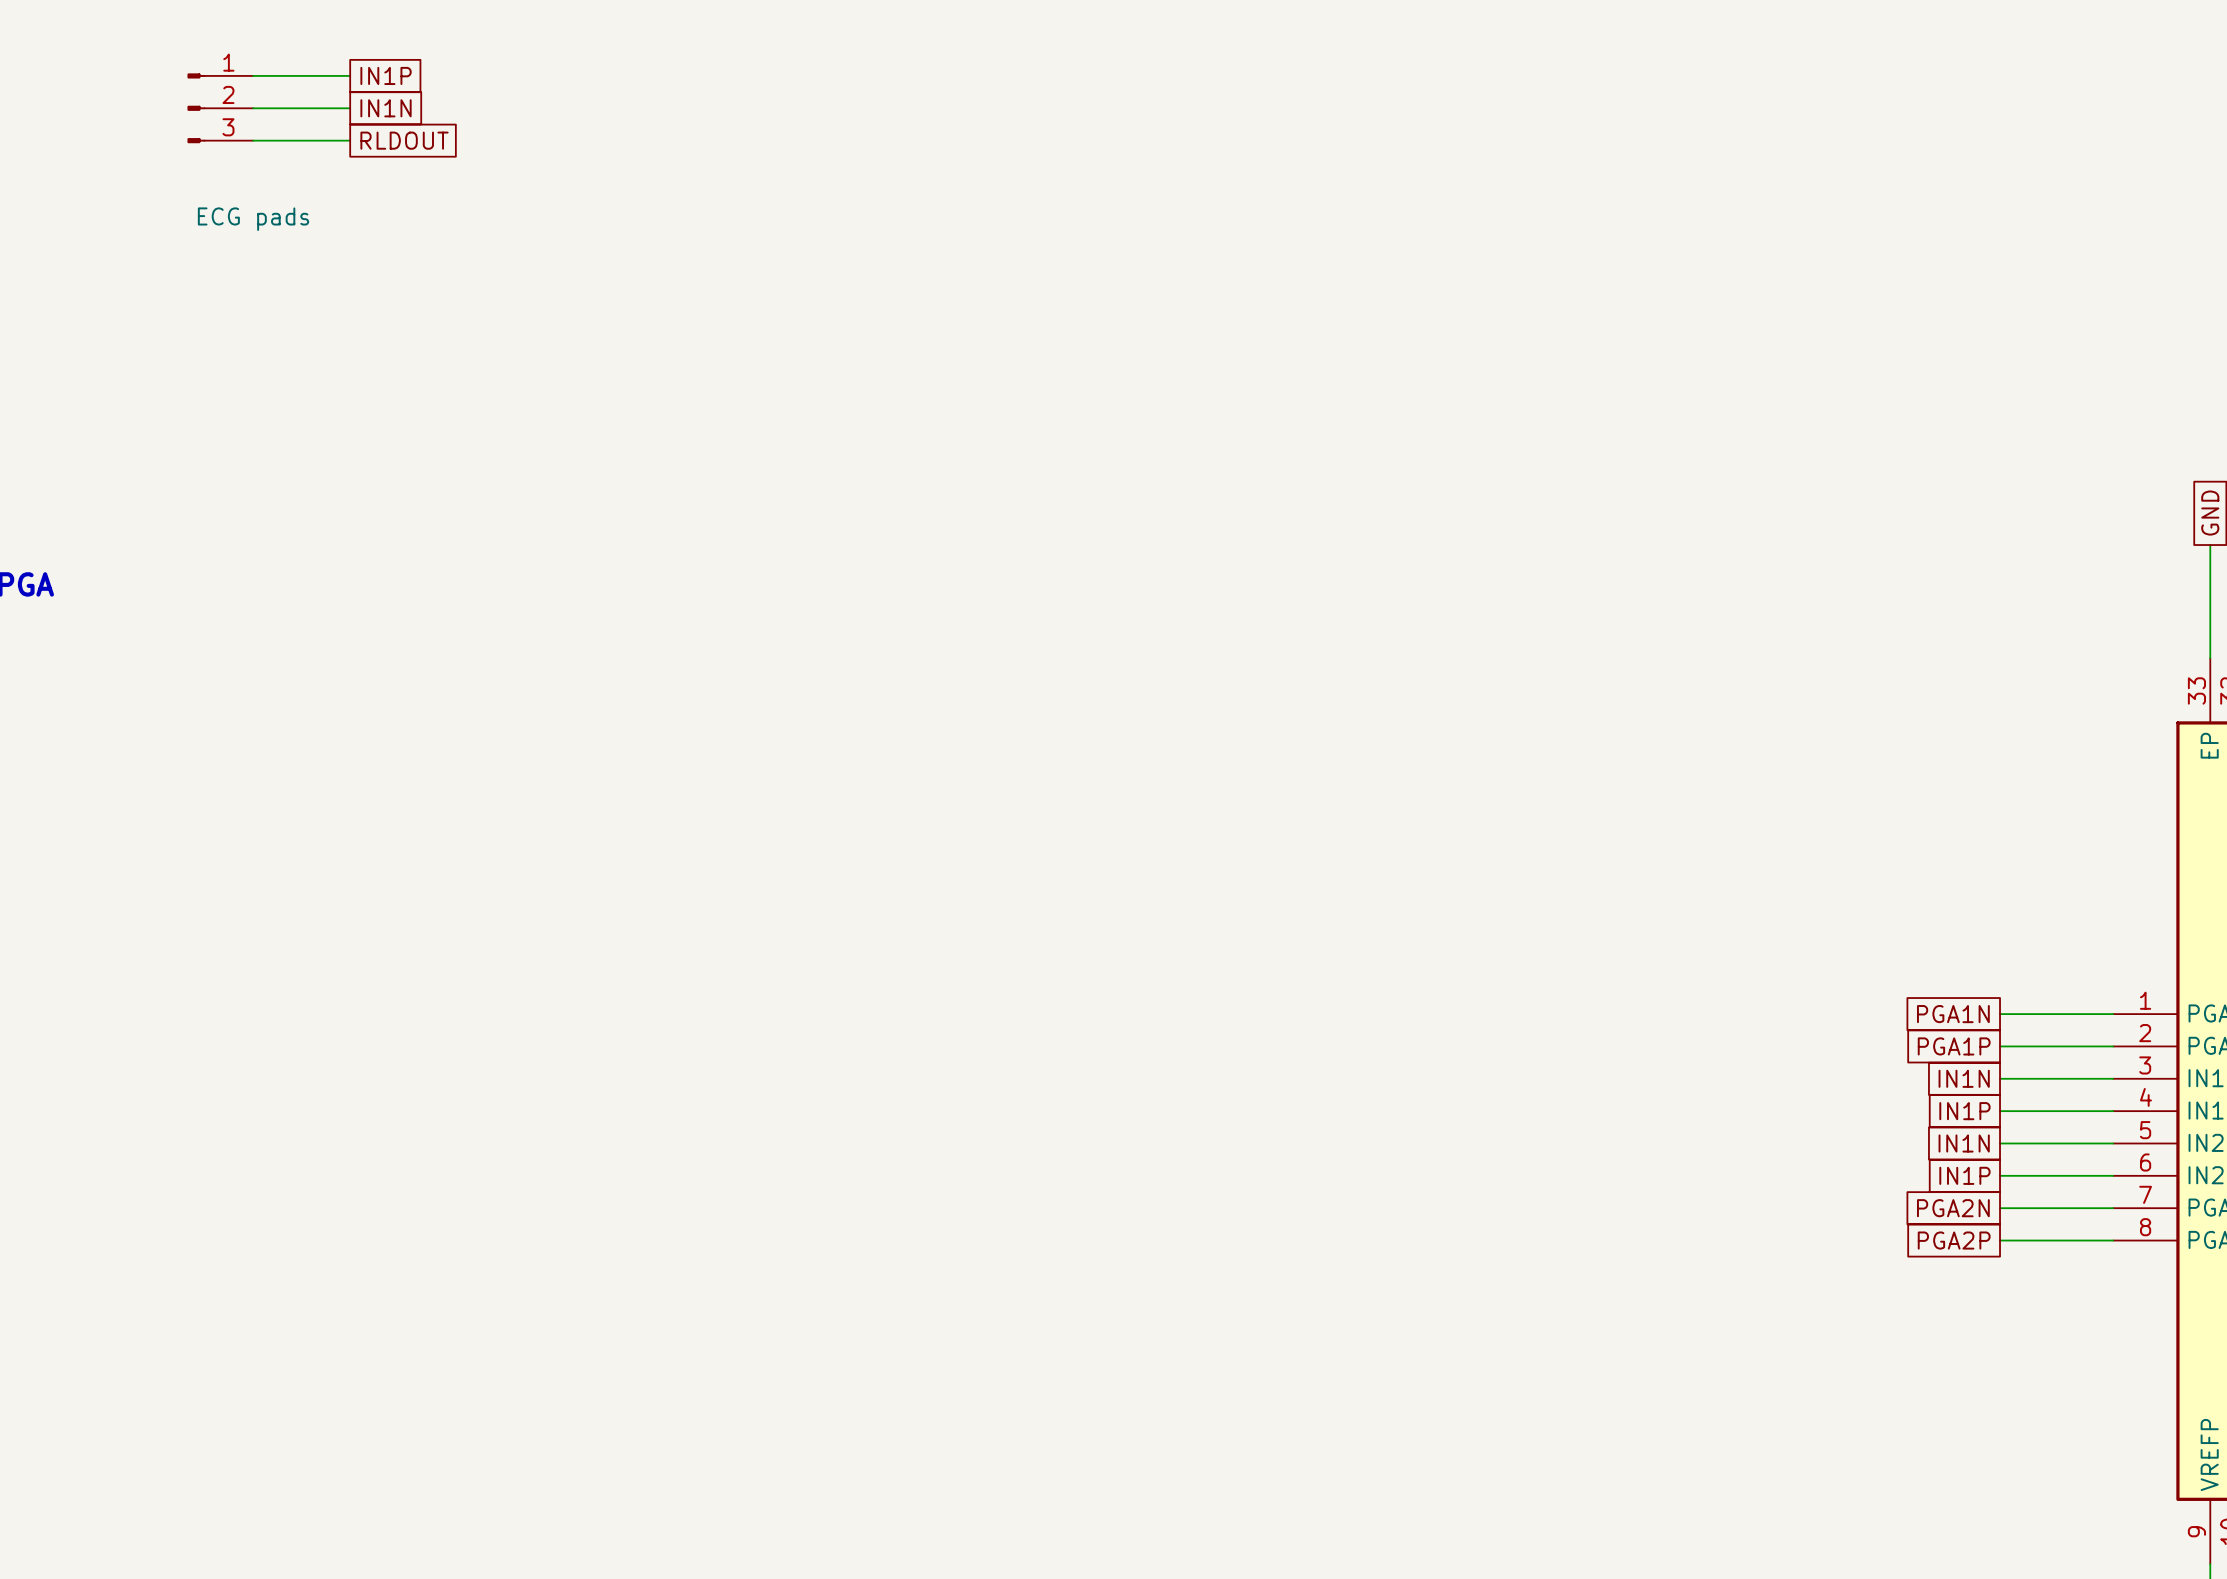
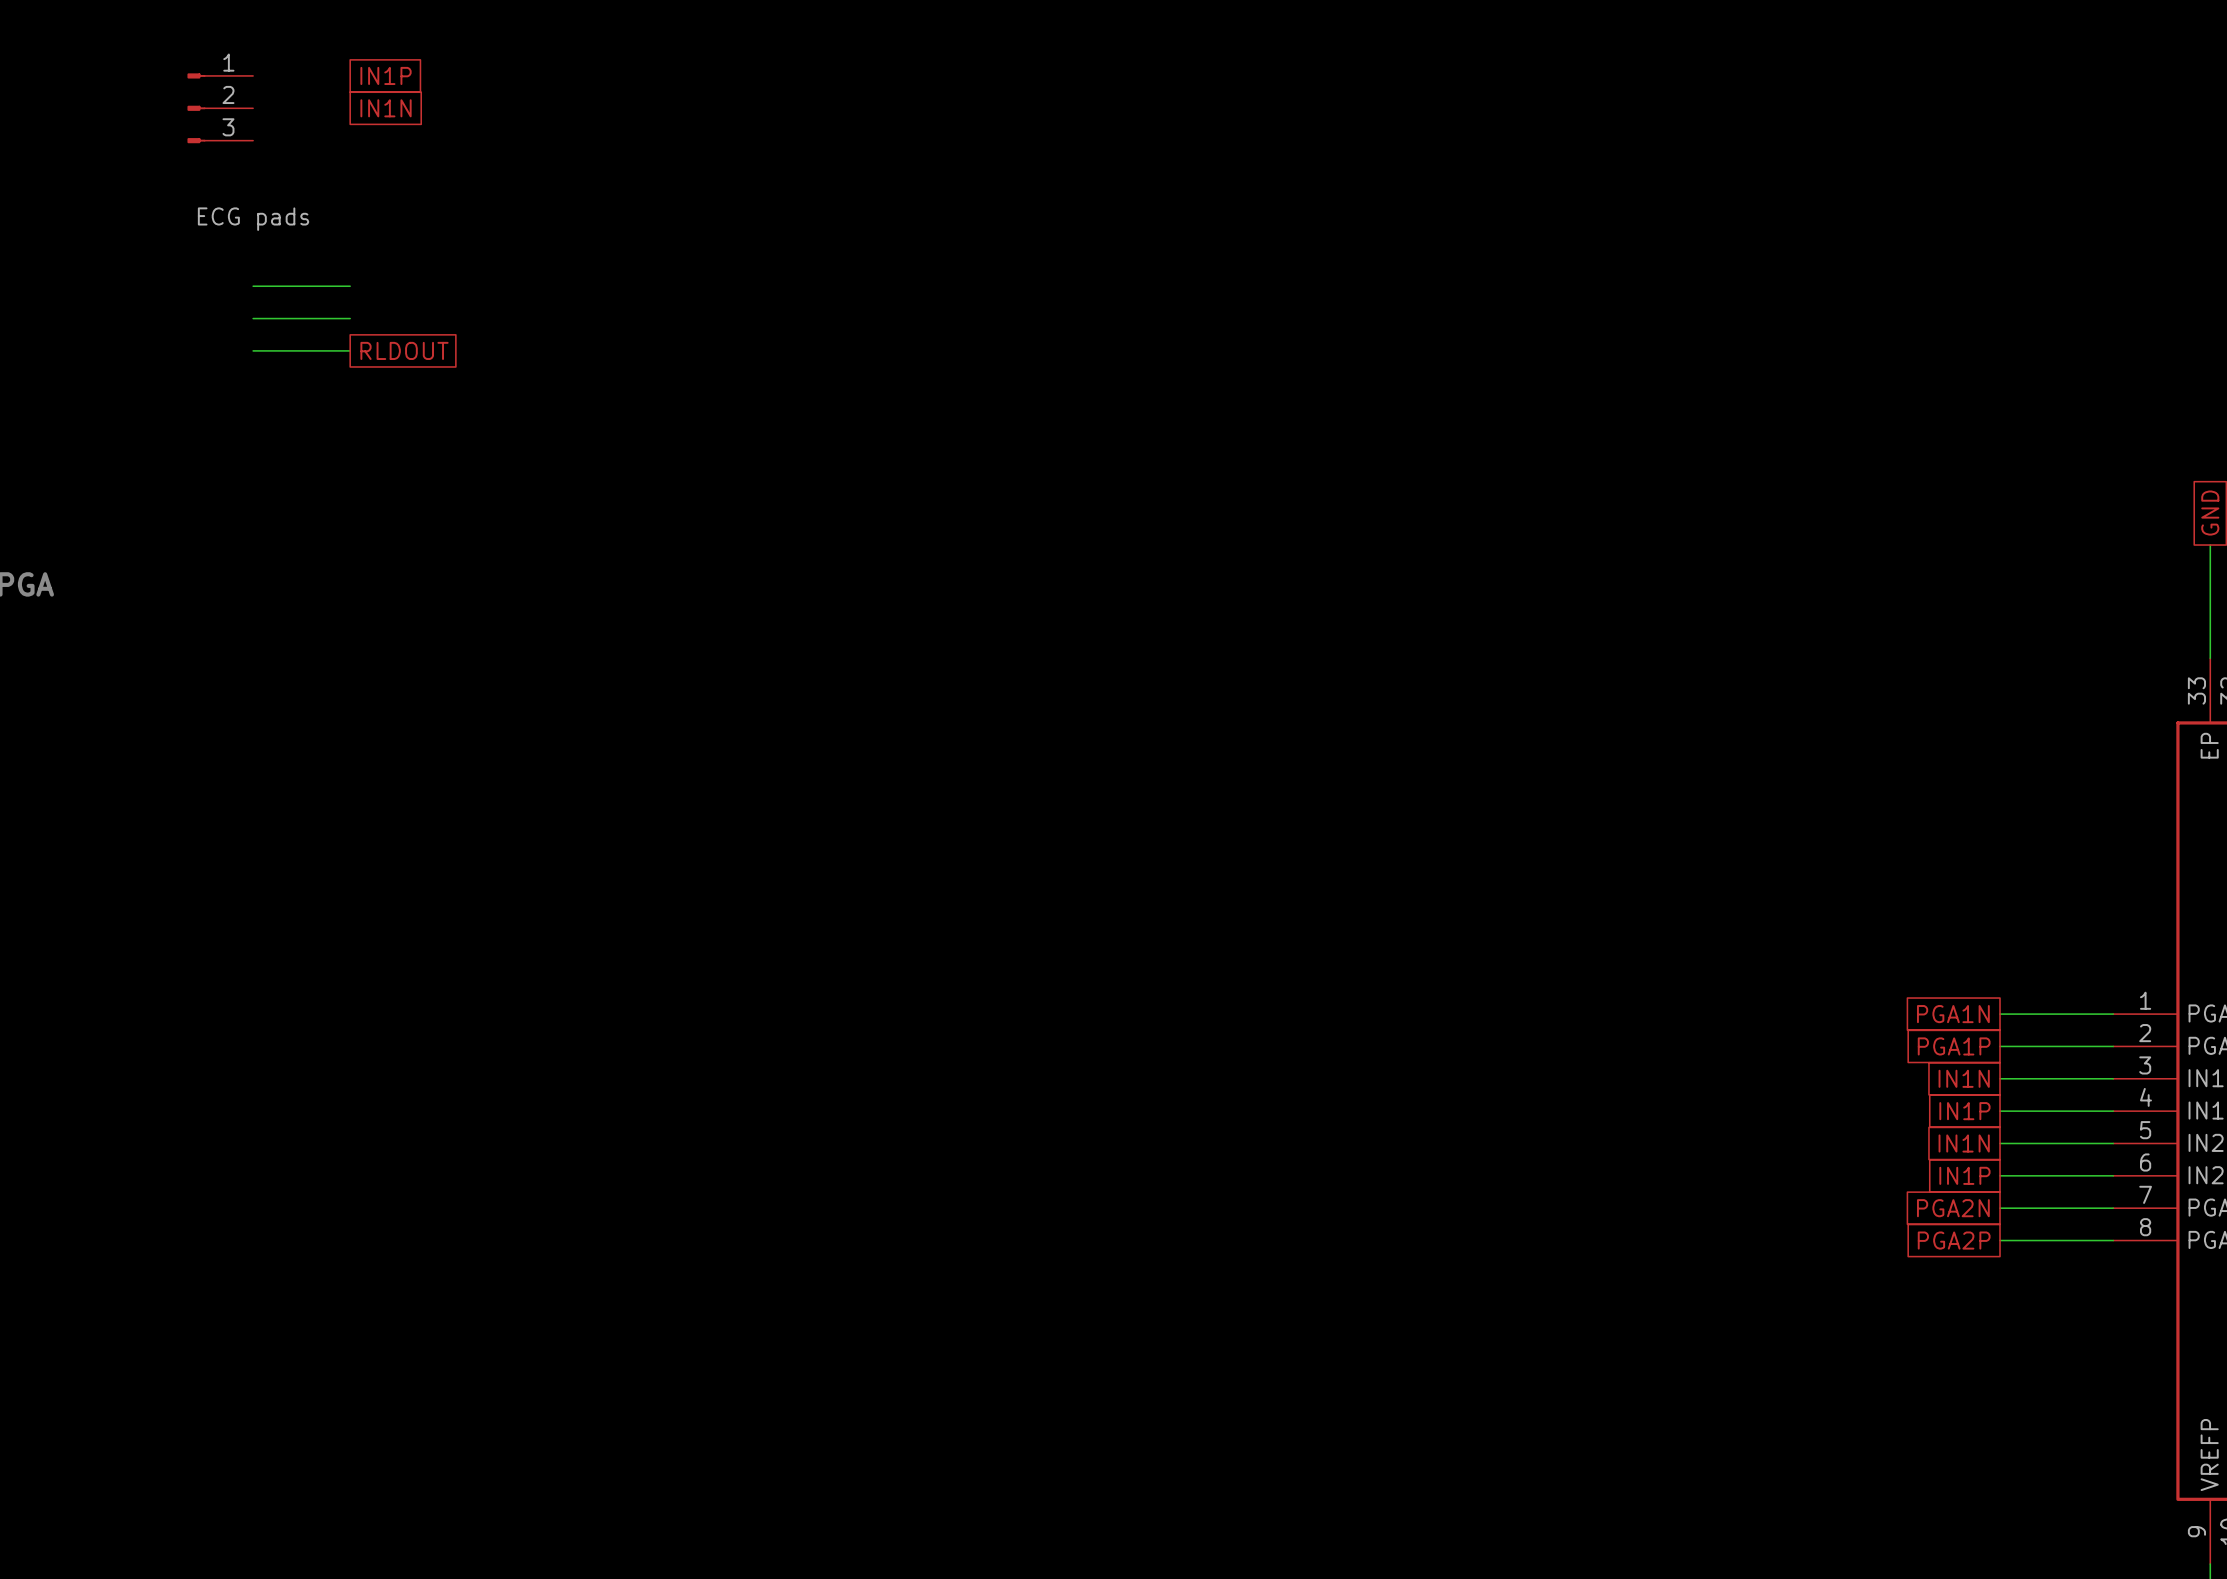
wire: (253, 75) (350, 75) -> (253, 286) (350, 286)
wire: (253, 108) (350, 108) -> (253, 318) (350, 318)
wire: (253, 140) (350, 140) -> (253, 350) (350, 350)
global label position: RLDOUT (404, 140) -> RLDOUT (404, 350)

